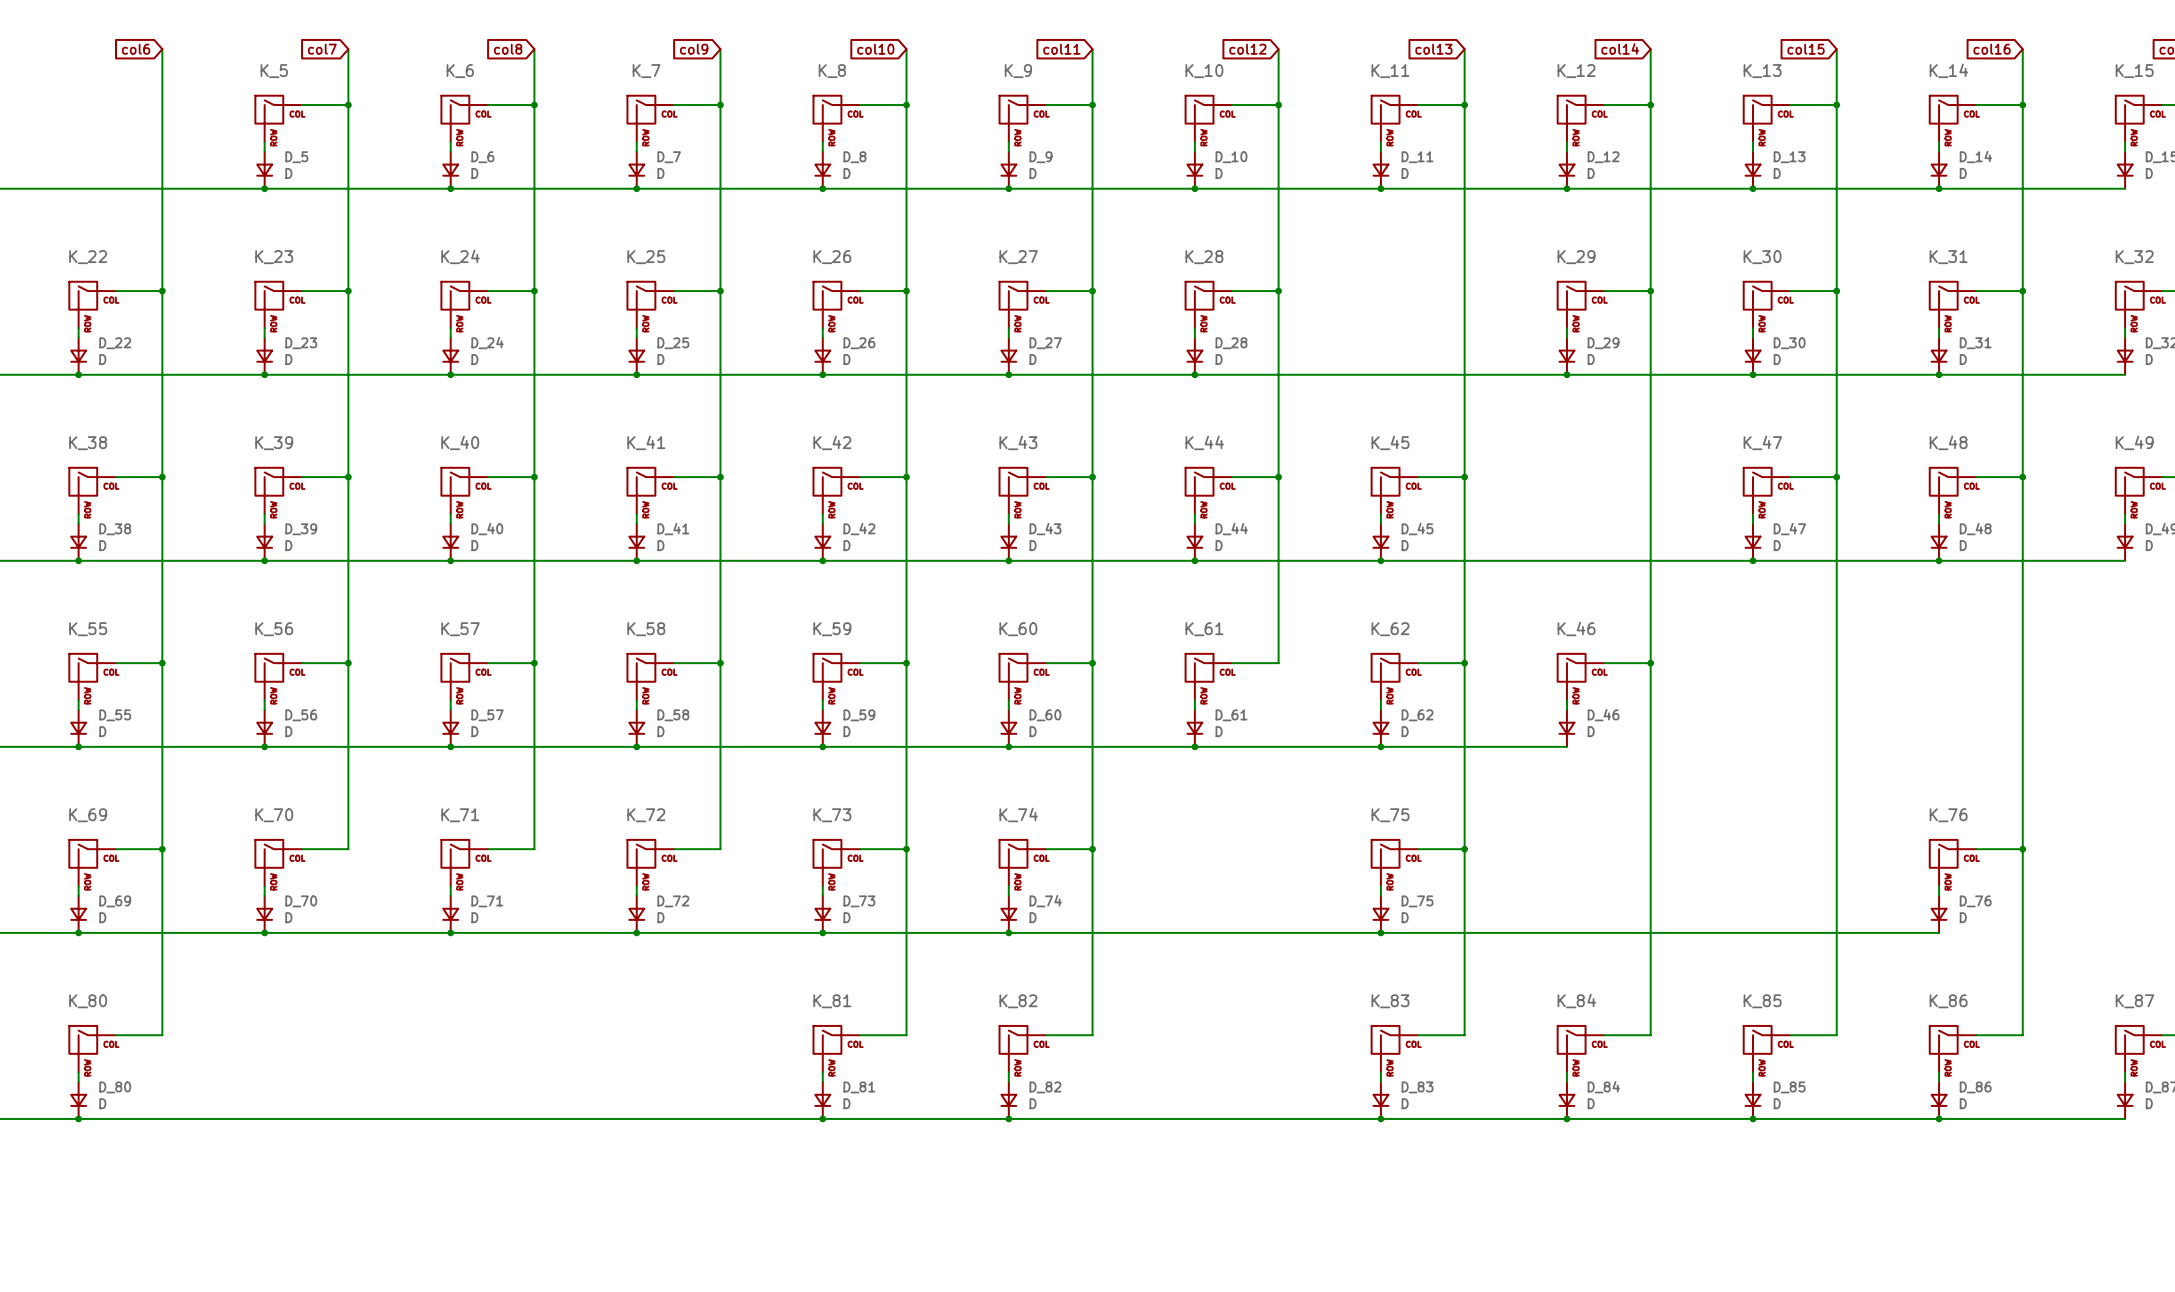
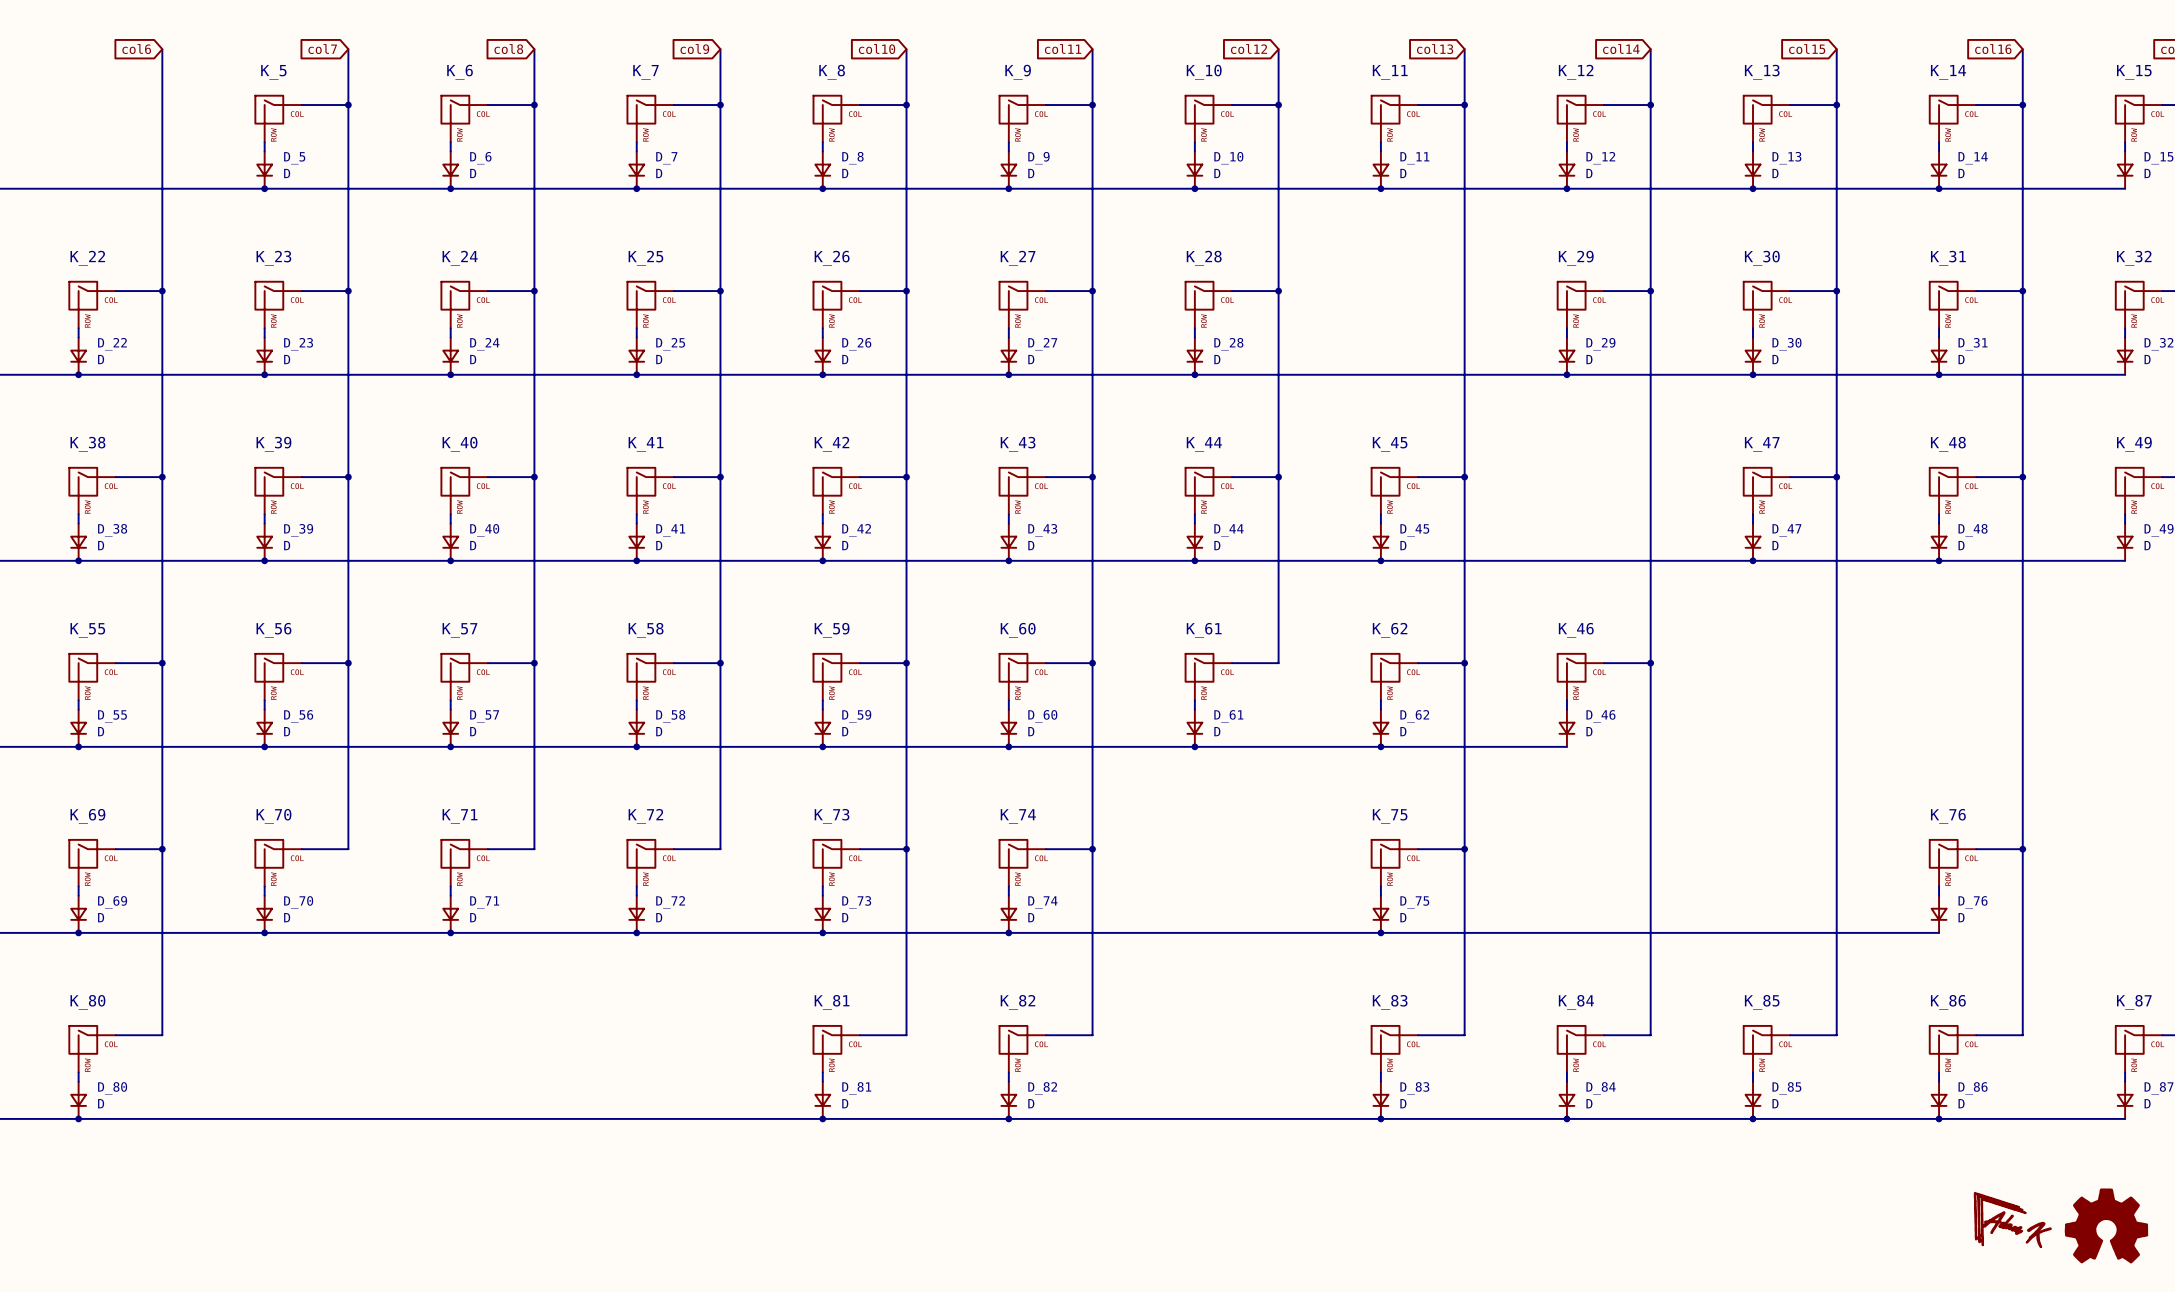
power symbol: none -> (2012, 1220)
power symbol: none -> (2106, 1225)

